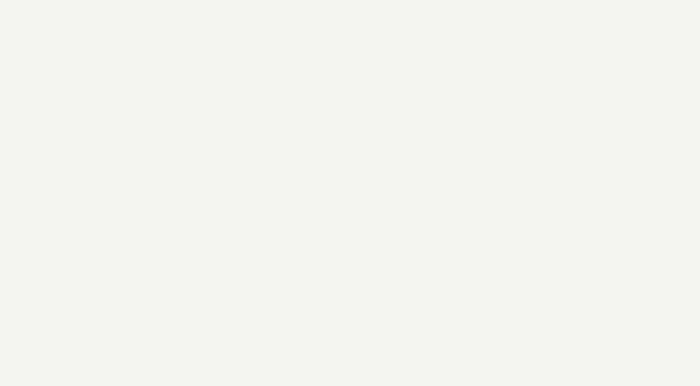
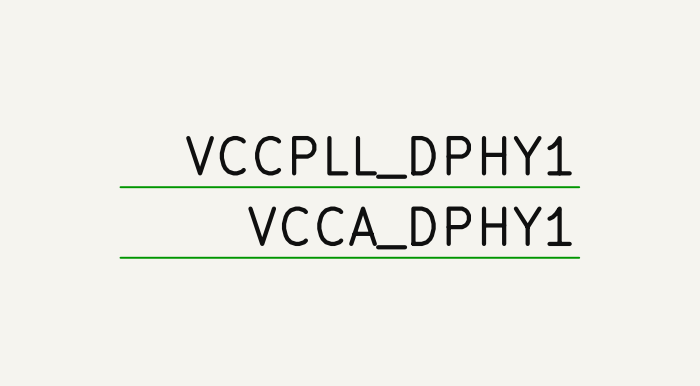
label: none -> VCCPLL_DPHY1 (378, 157)
wire: none -> (120, 187) (579, 187)
label: none -> VCCA_DPHY1 (410, 227)
wire: none -> (120, 257) (579, 257)

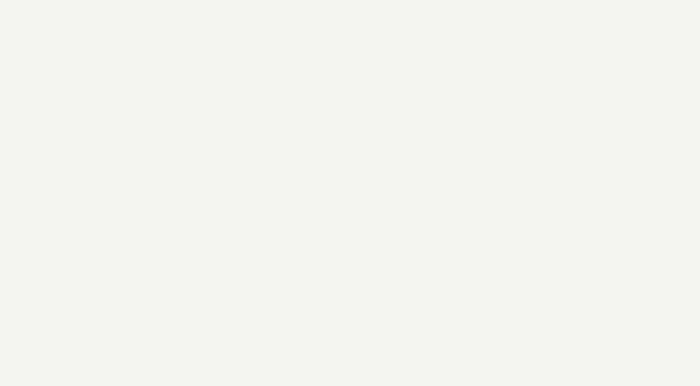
label: VCCPLL_DPHY1 (378, 157) -> none
wire: (120, 187) (579, 187) -> none
label: VCCA_DPHY1 (410, 227) -> none
wire: (120, 257) (579, 257) -> none

